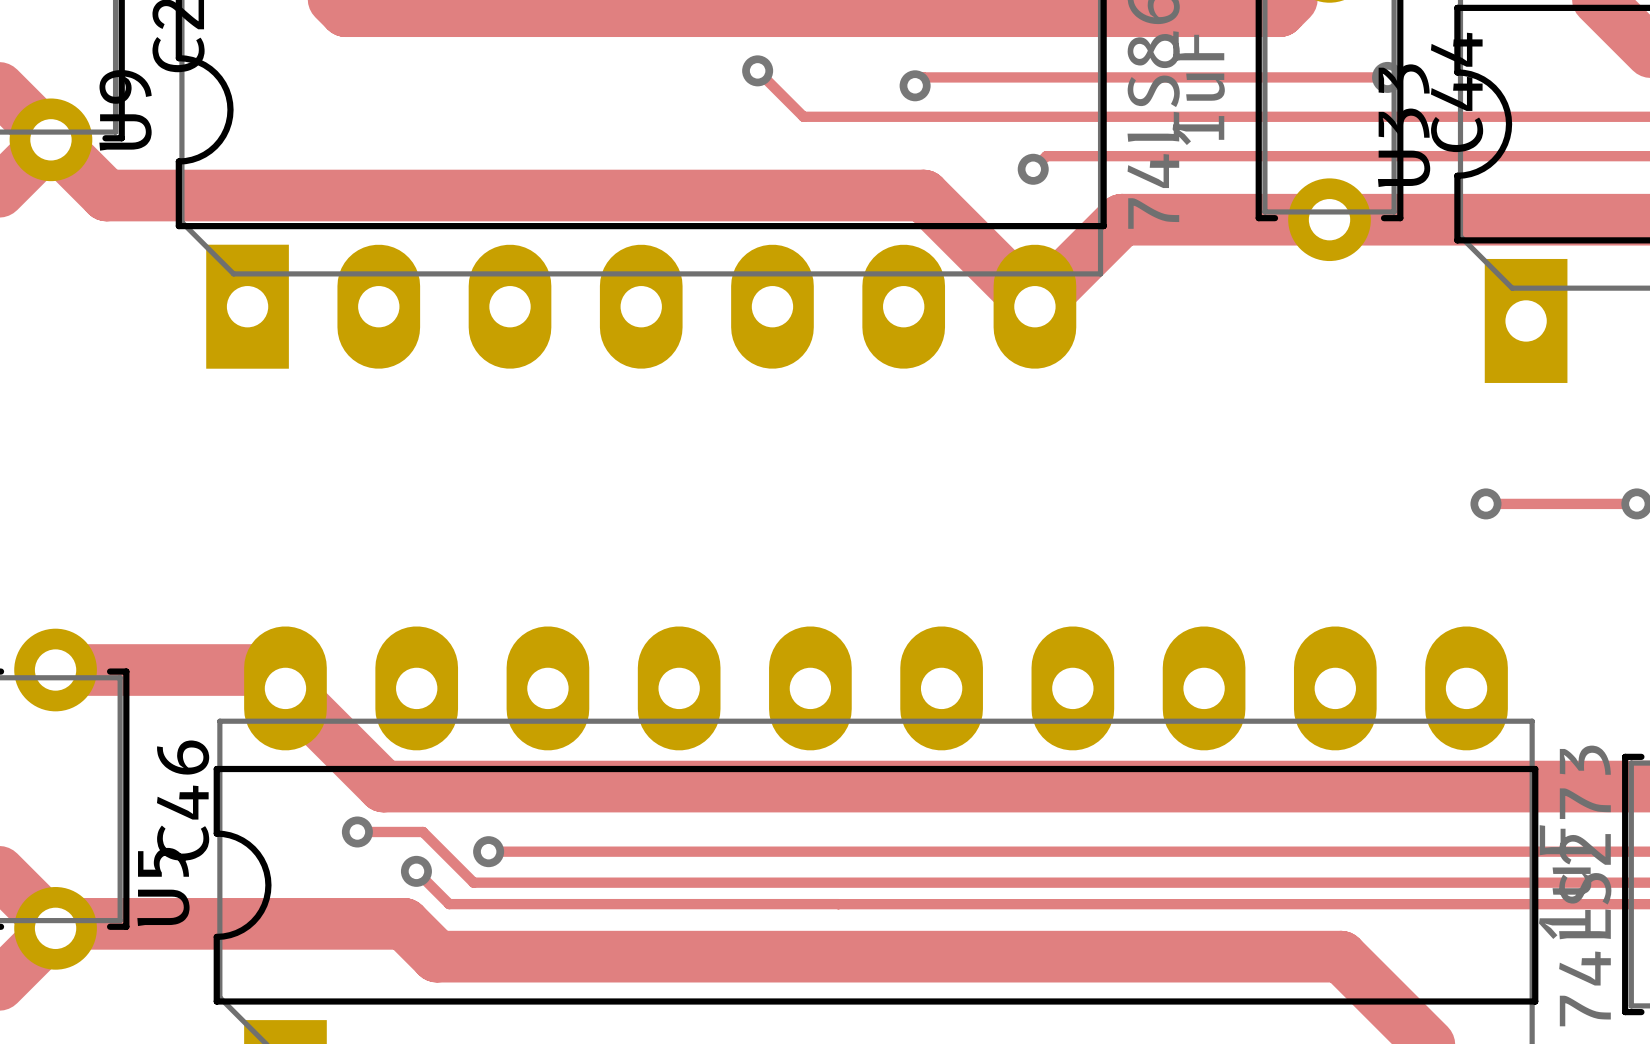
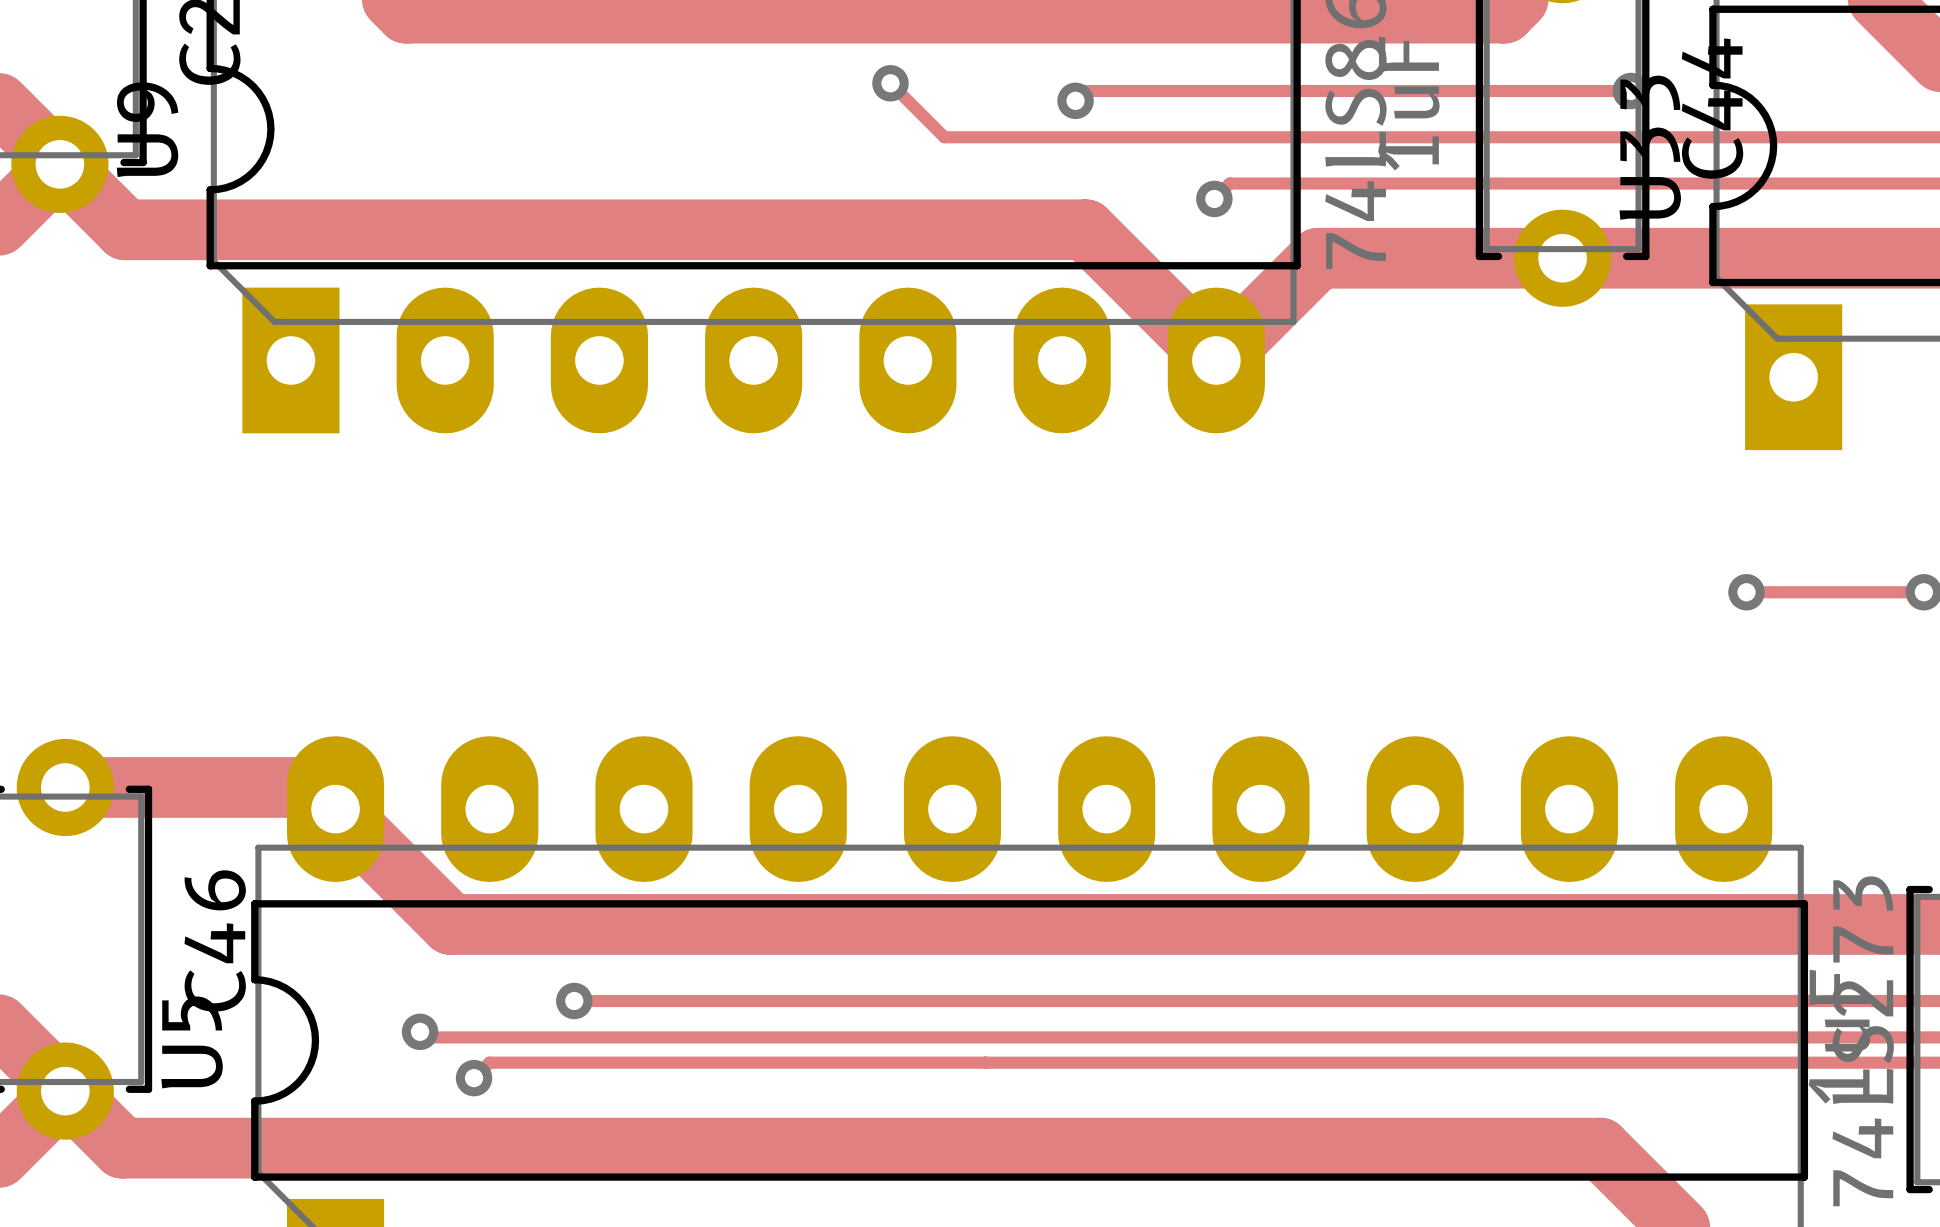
track: (357, 831) (423, 831) (473, 882) -> (420, 1031) (425, 1037) (556, 1037)
via: (357, 831) -> none
track: (416, 871) (449, 904) -> (474, 1078) (489, 1062) (527, 1062)
via: (416, 871) -> none
via: none -> (420, 1031)
via: none -> (474, 1078)
track: (55, 928) (60, 923) (404, 923) (437, 956) (1341, 956) (1361, 976) -> (65, 1091) (122, 1148) (1599, 1148)

